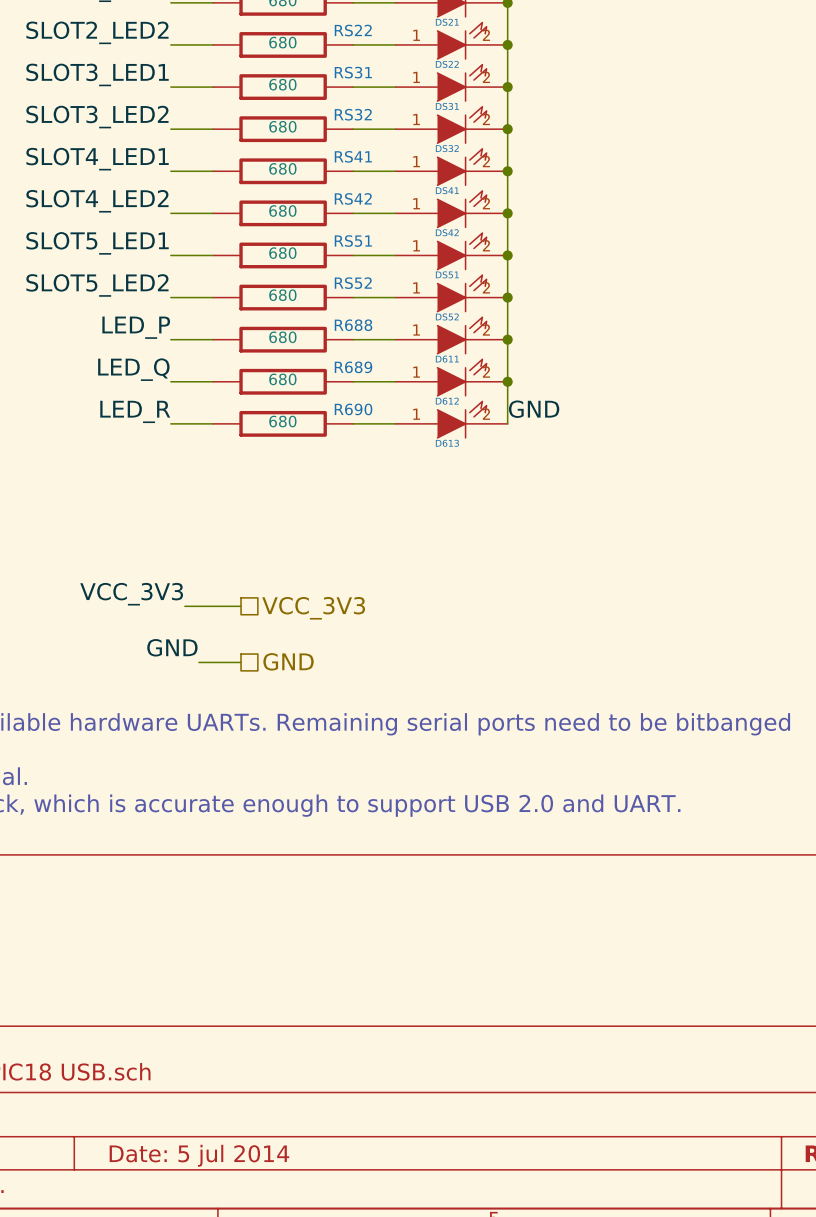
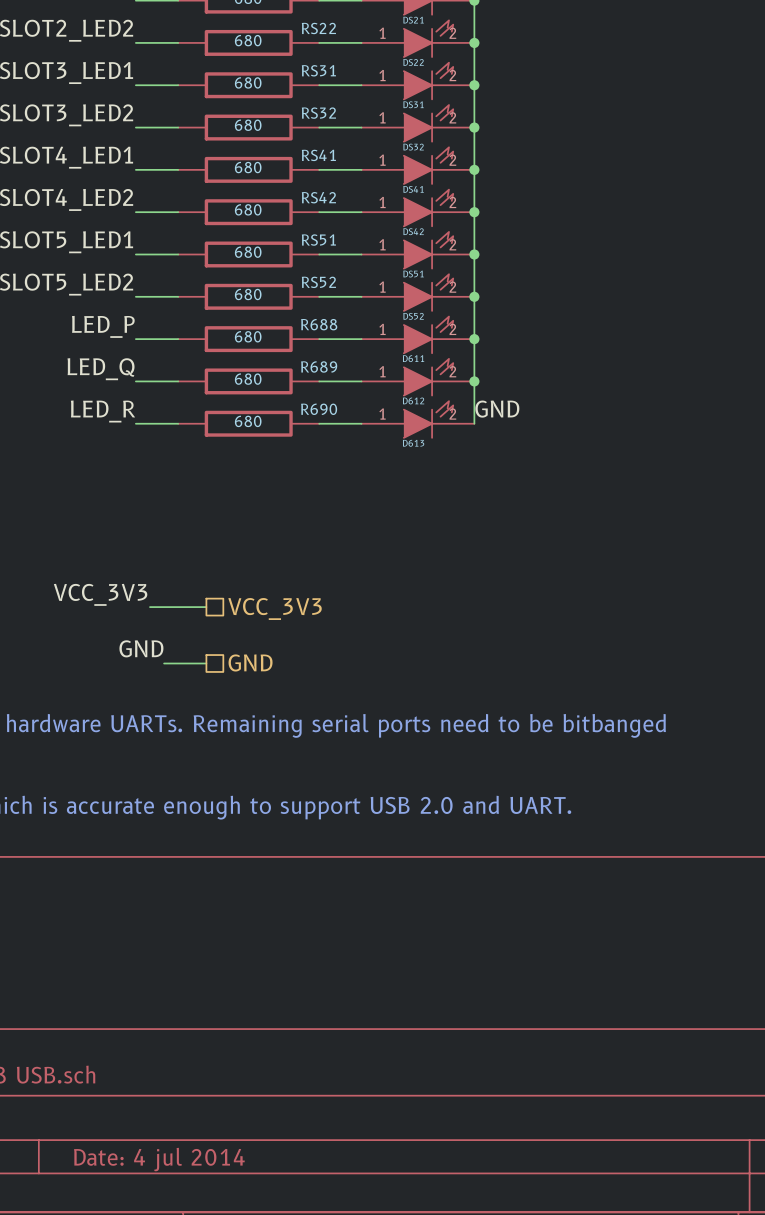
title block: Date: 5 jul 2014 (199, 1155) -> Date: 4 jul 2014 (159, 1159)

